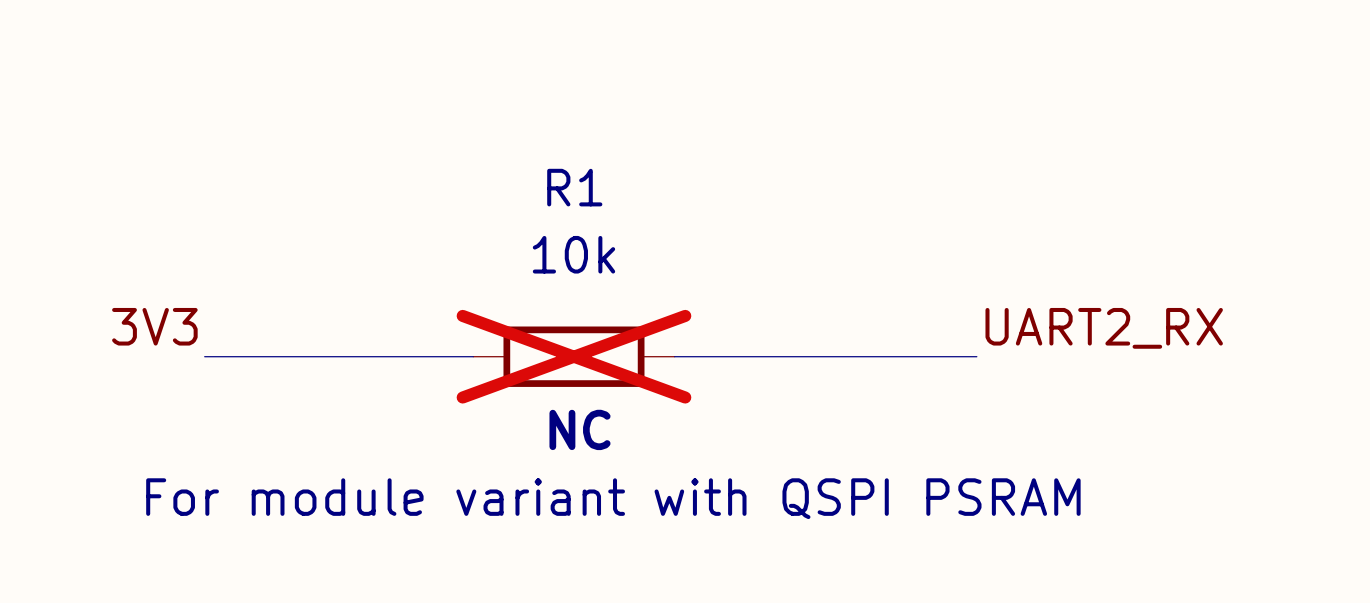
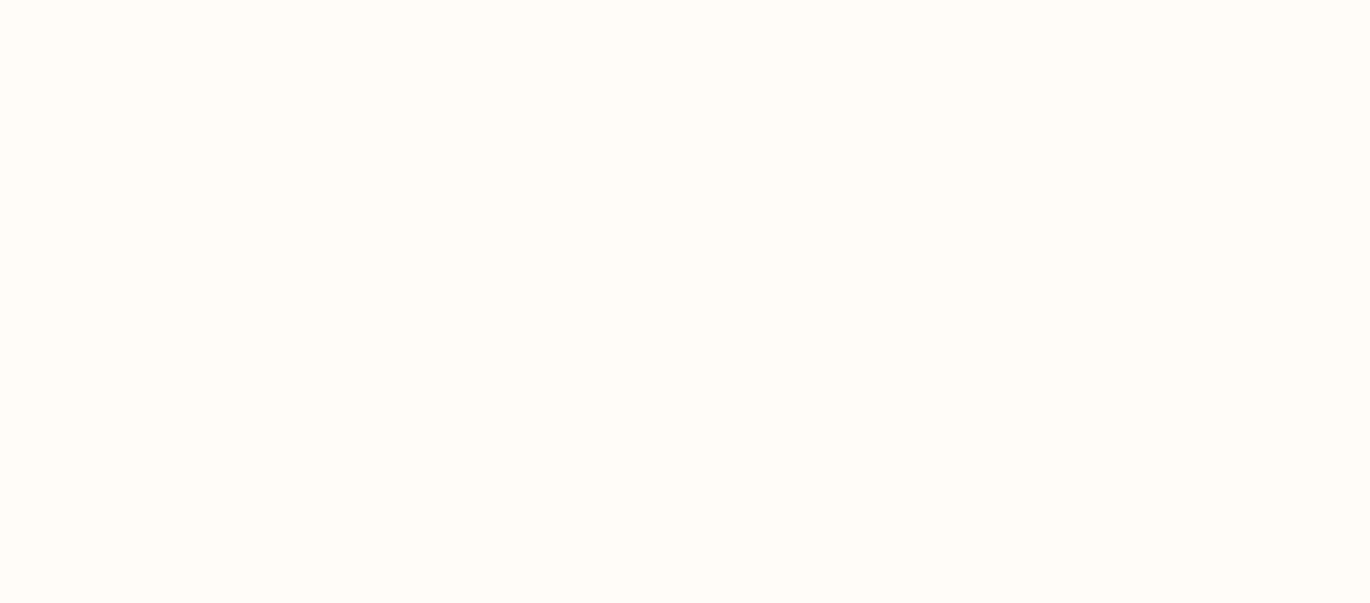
label: 3V3 (154, 326) -> none
label: UART2_RX (1104, 328) -> none
wire: (204, 356) (473, 356) -> none
R1: 10k (573, 356) -> none
wire: (674, 356) (976, 356) -> none
text: NC (580, 429) -> none
text: For module variant with QSPI PSRAM (613, 498) -> none

